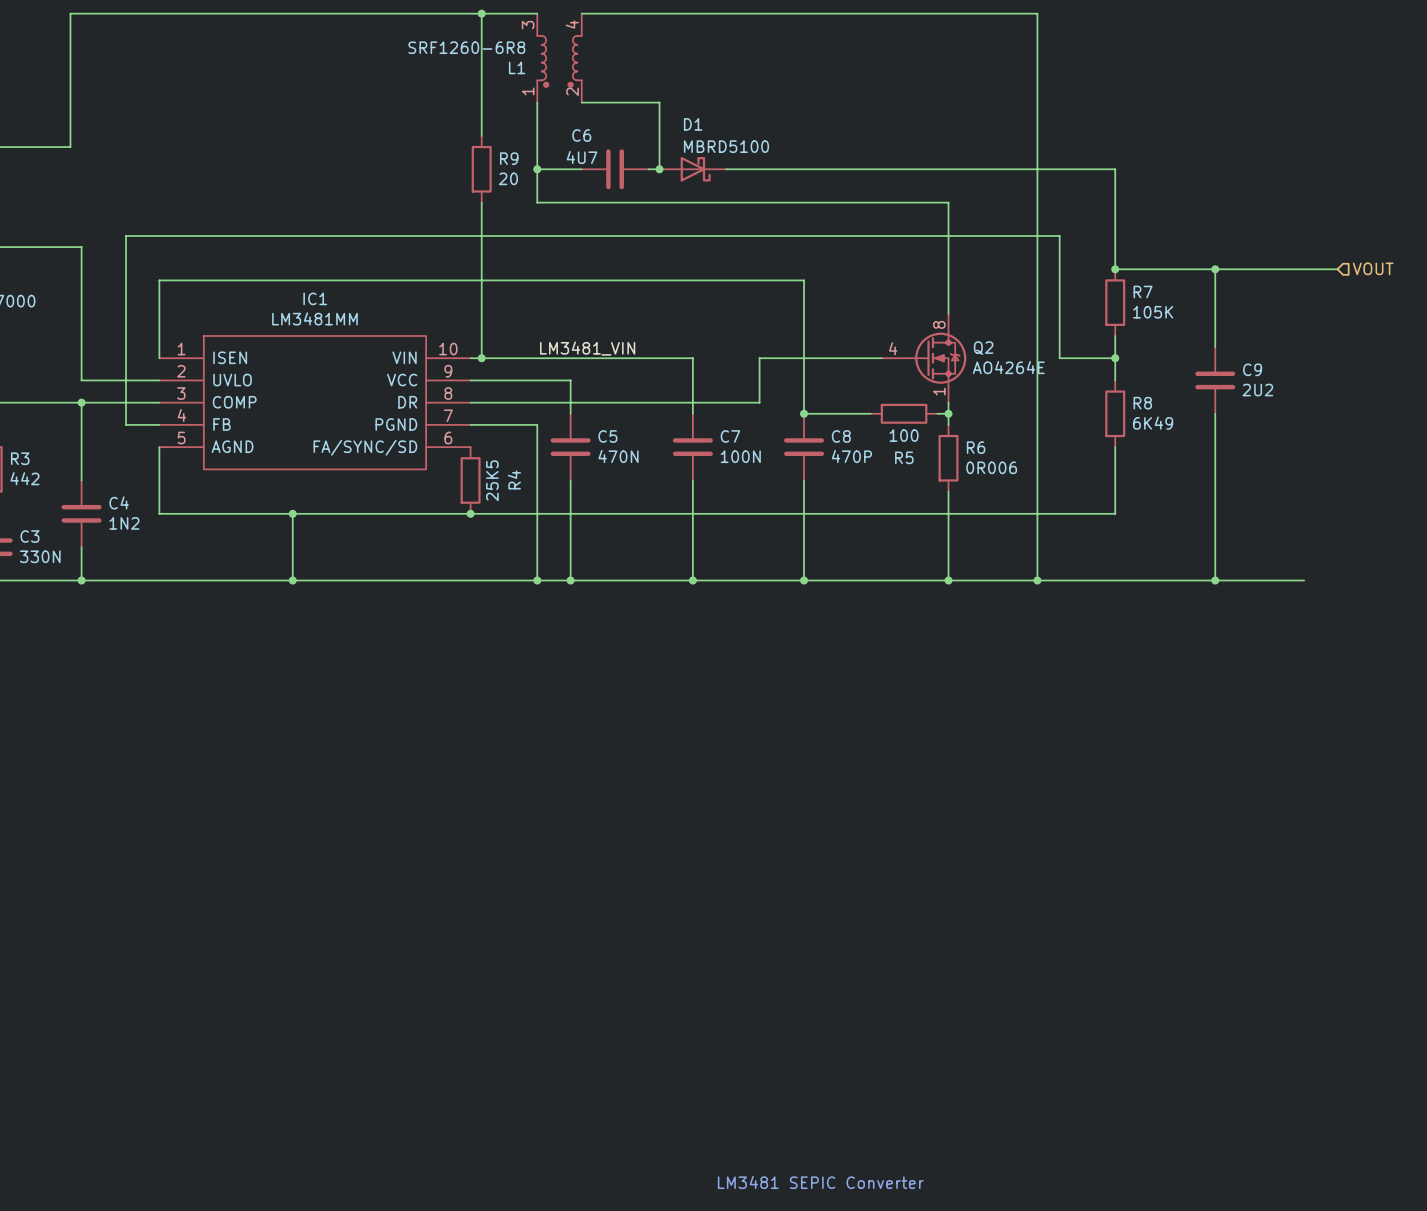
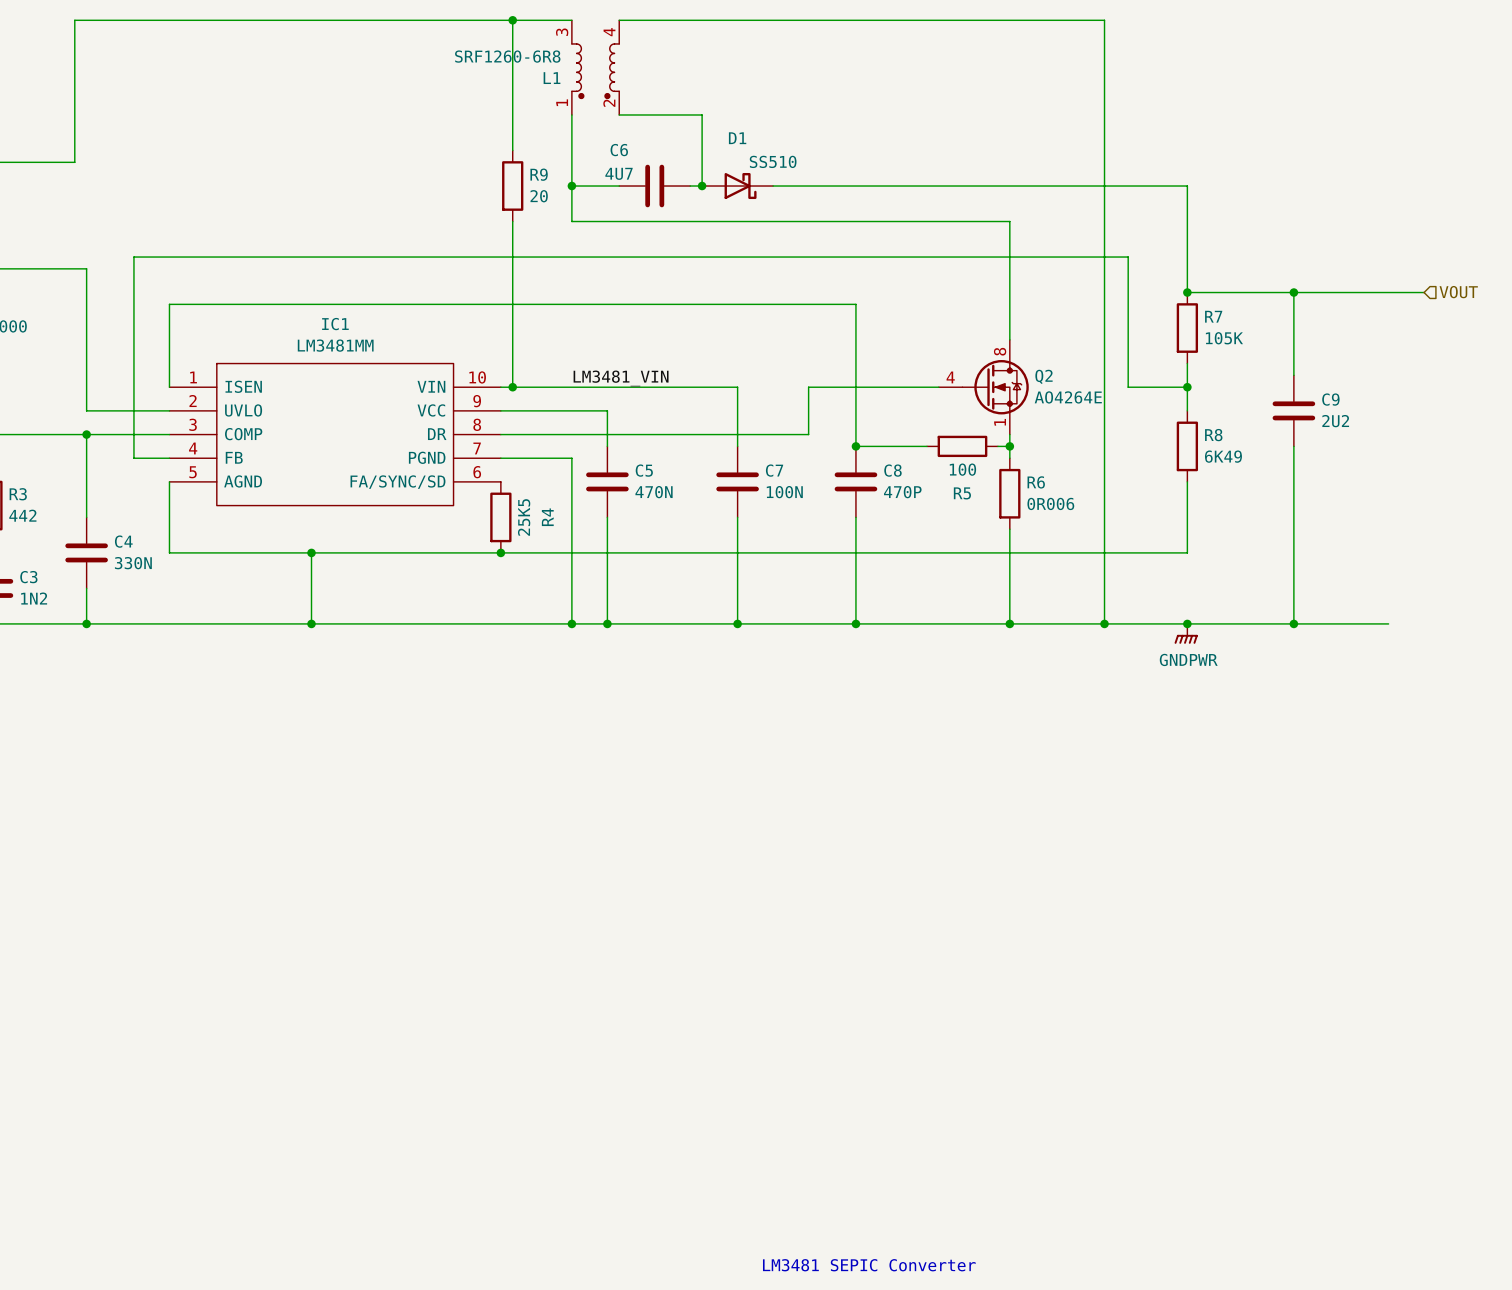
D1 value: MBRD5100 (726, 146) -> SS510 (773, 161)
C4 value: 1N2 (124, 523) -> 330N (133, 563)
C3 value: 330N (40, 556) -> 1N2 (34, 598)
junction: none -> (1187, 623)
power symbol: none -> GNDPWR (1186, 633)

